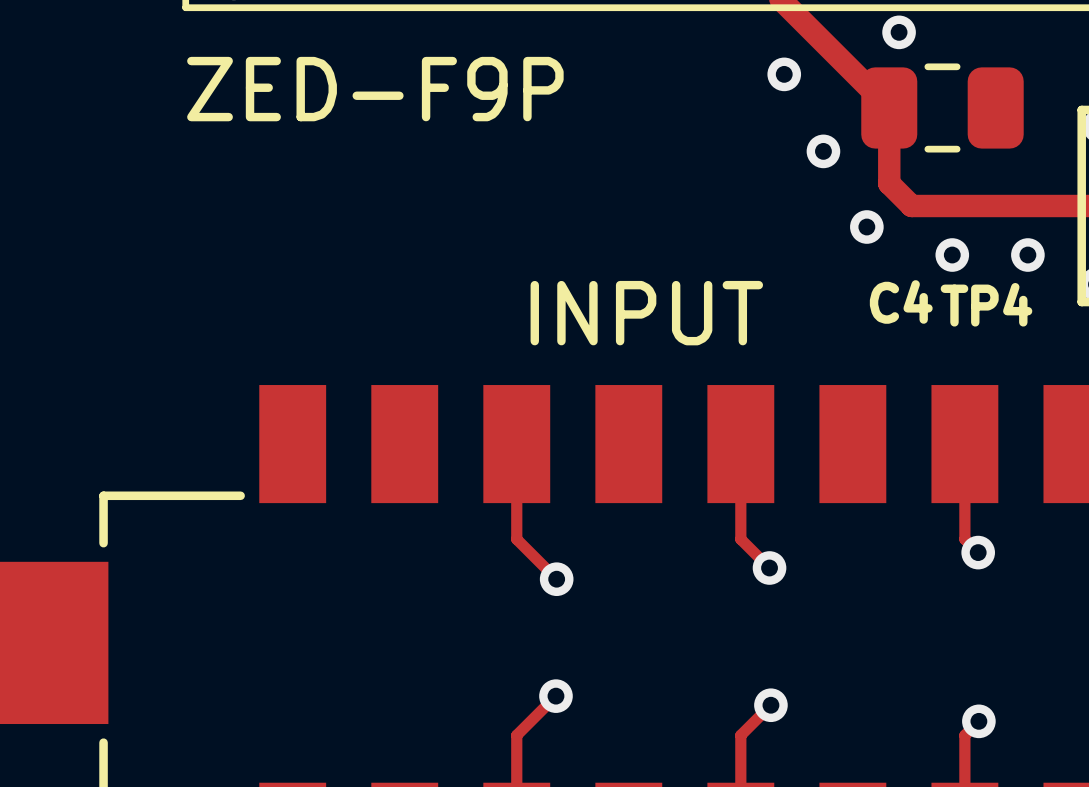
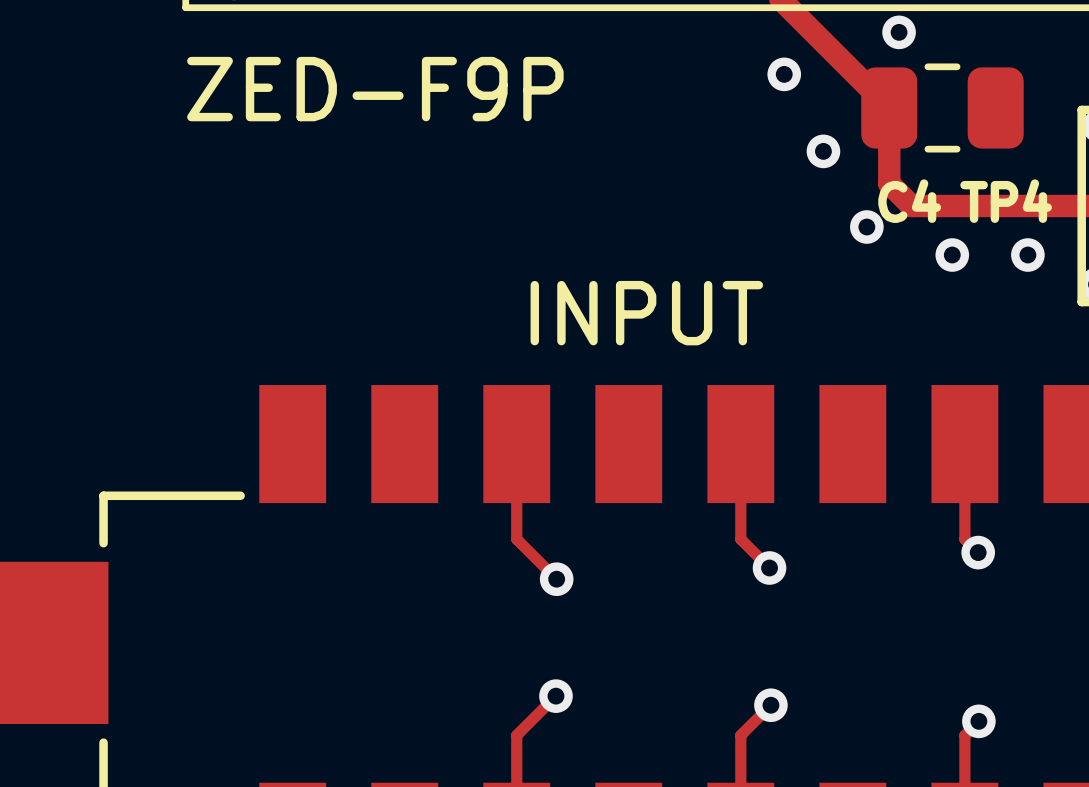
C4 name position: C4 (901, 301) -> C4 (909, 201)
TP4 name position: TP4 (986, 304) -> TP4 (1006, 201)

